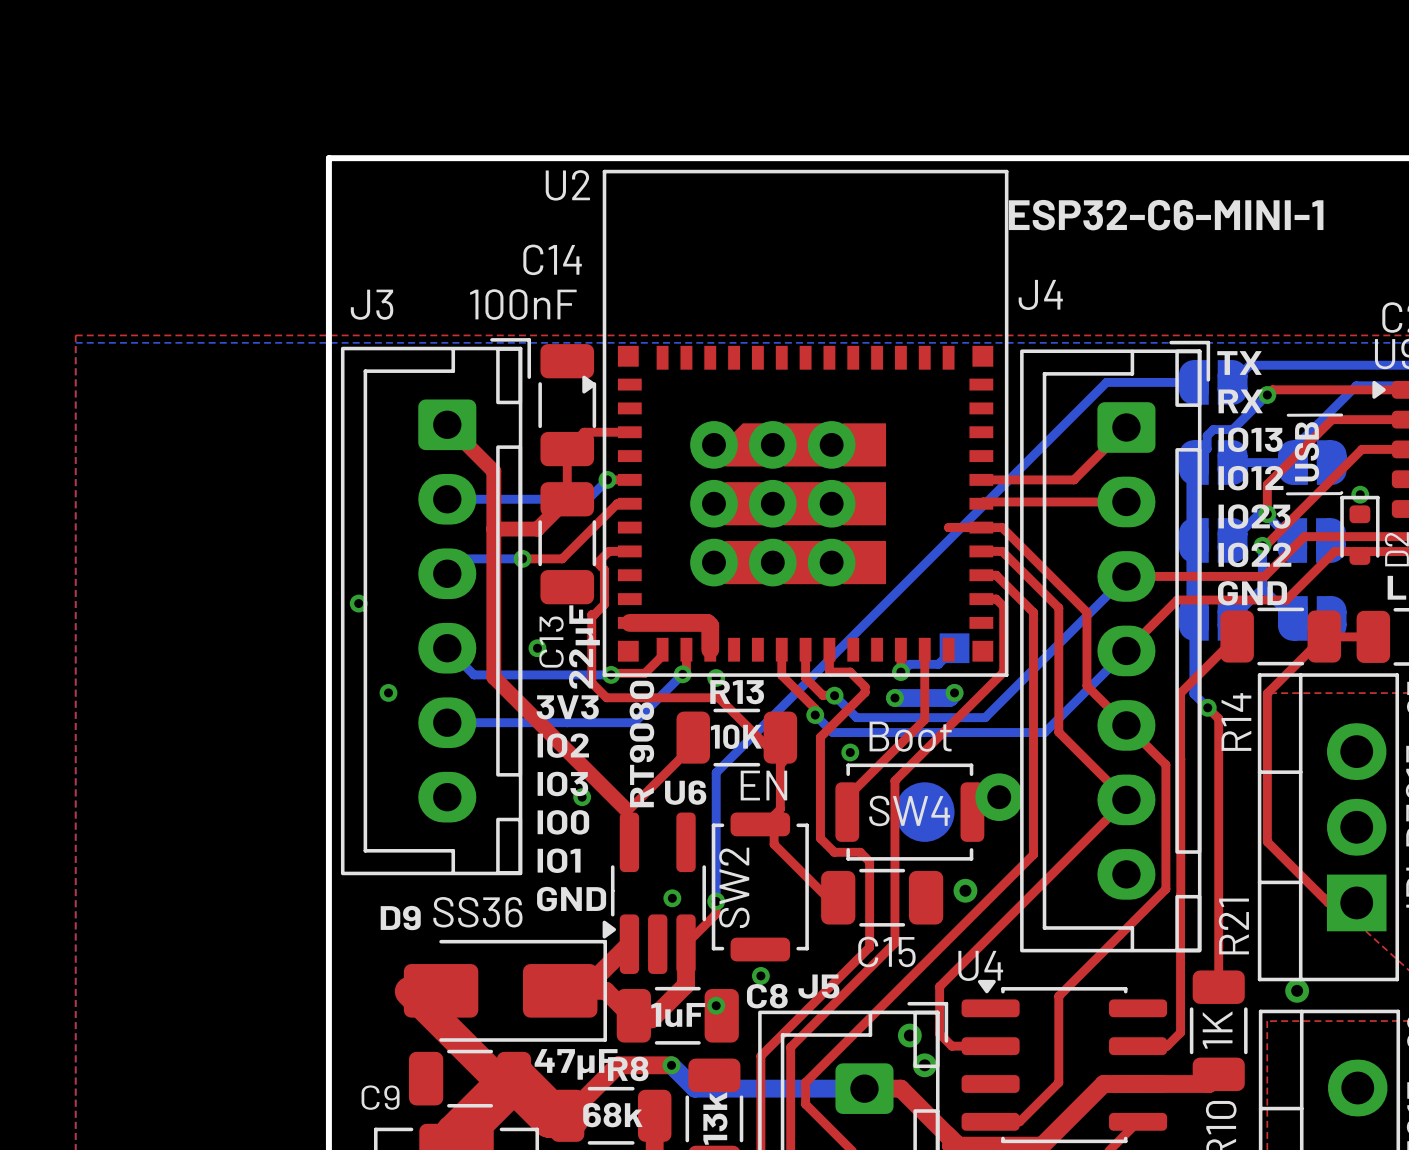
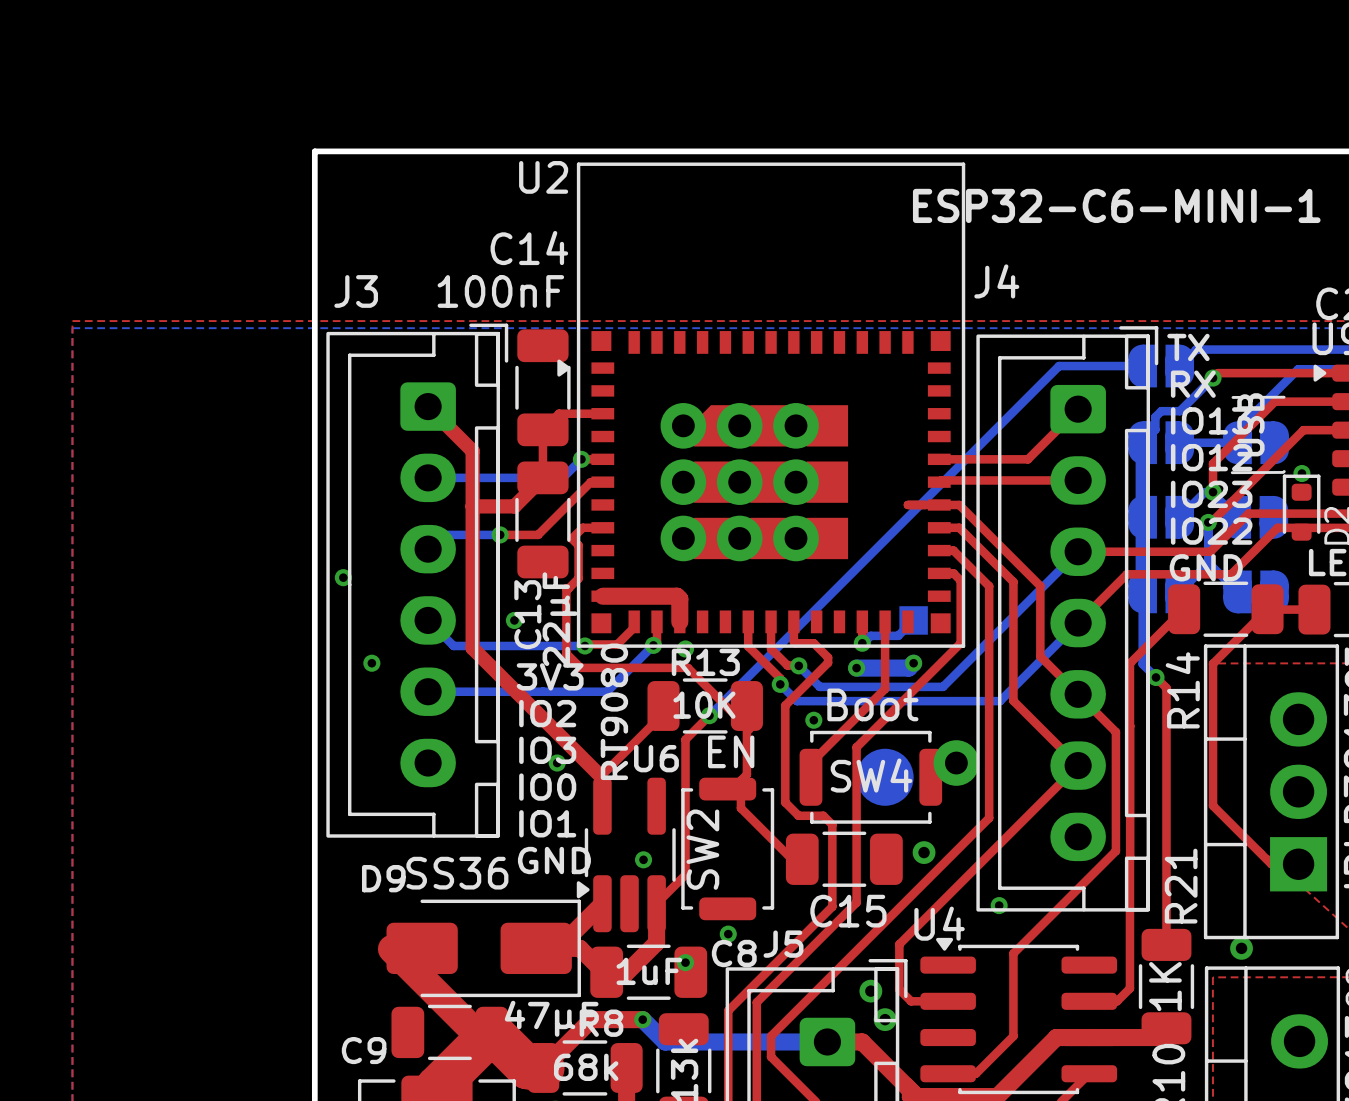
top track: none -> (709, 715) (685, 739) (685, 862)
bottom track: (741, 747) (716, 772) (716, 901) -> none
via position: (716, 901) -> (709, 715)
via: none -> (999, 905)

